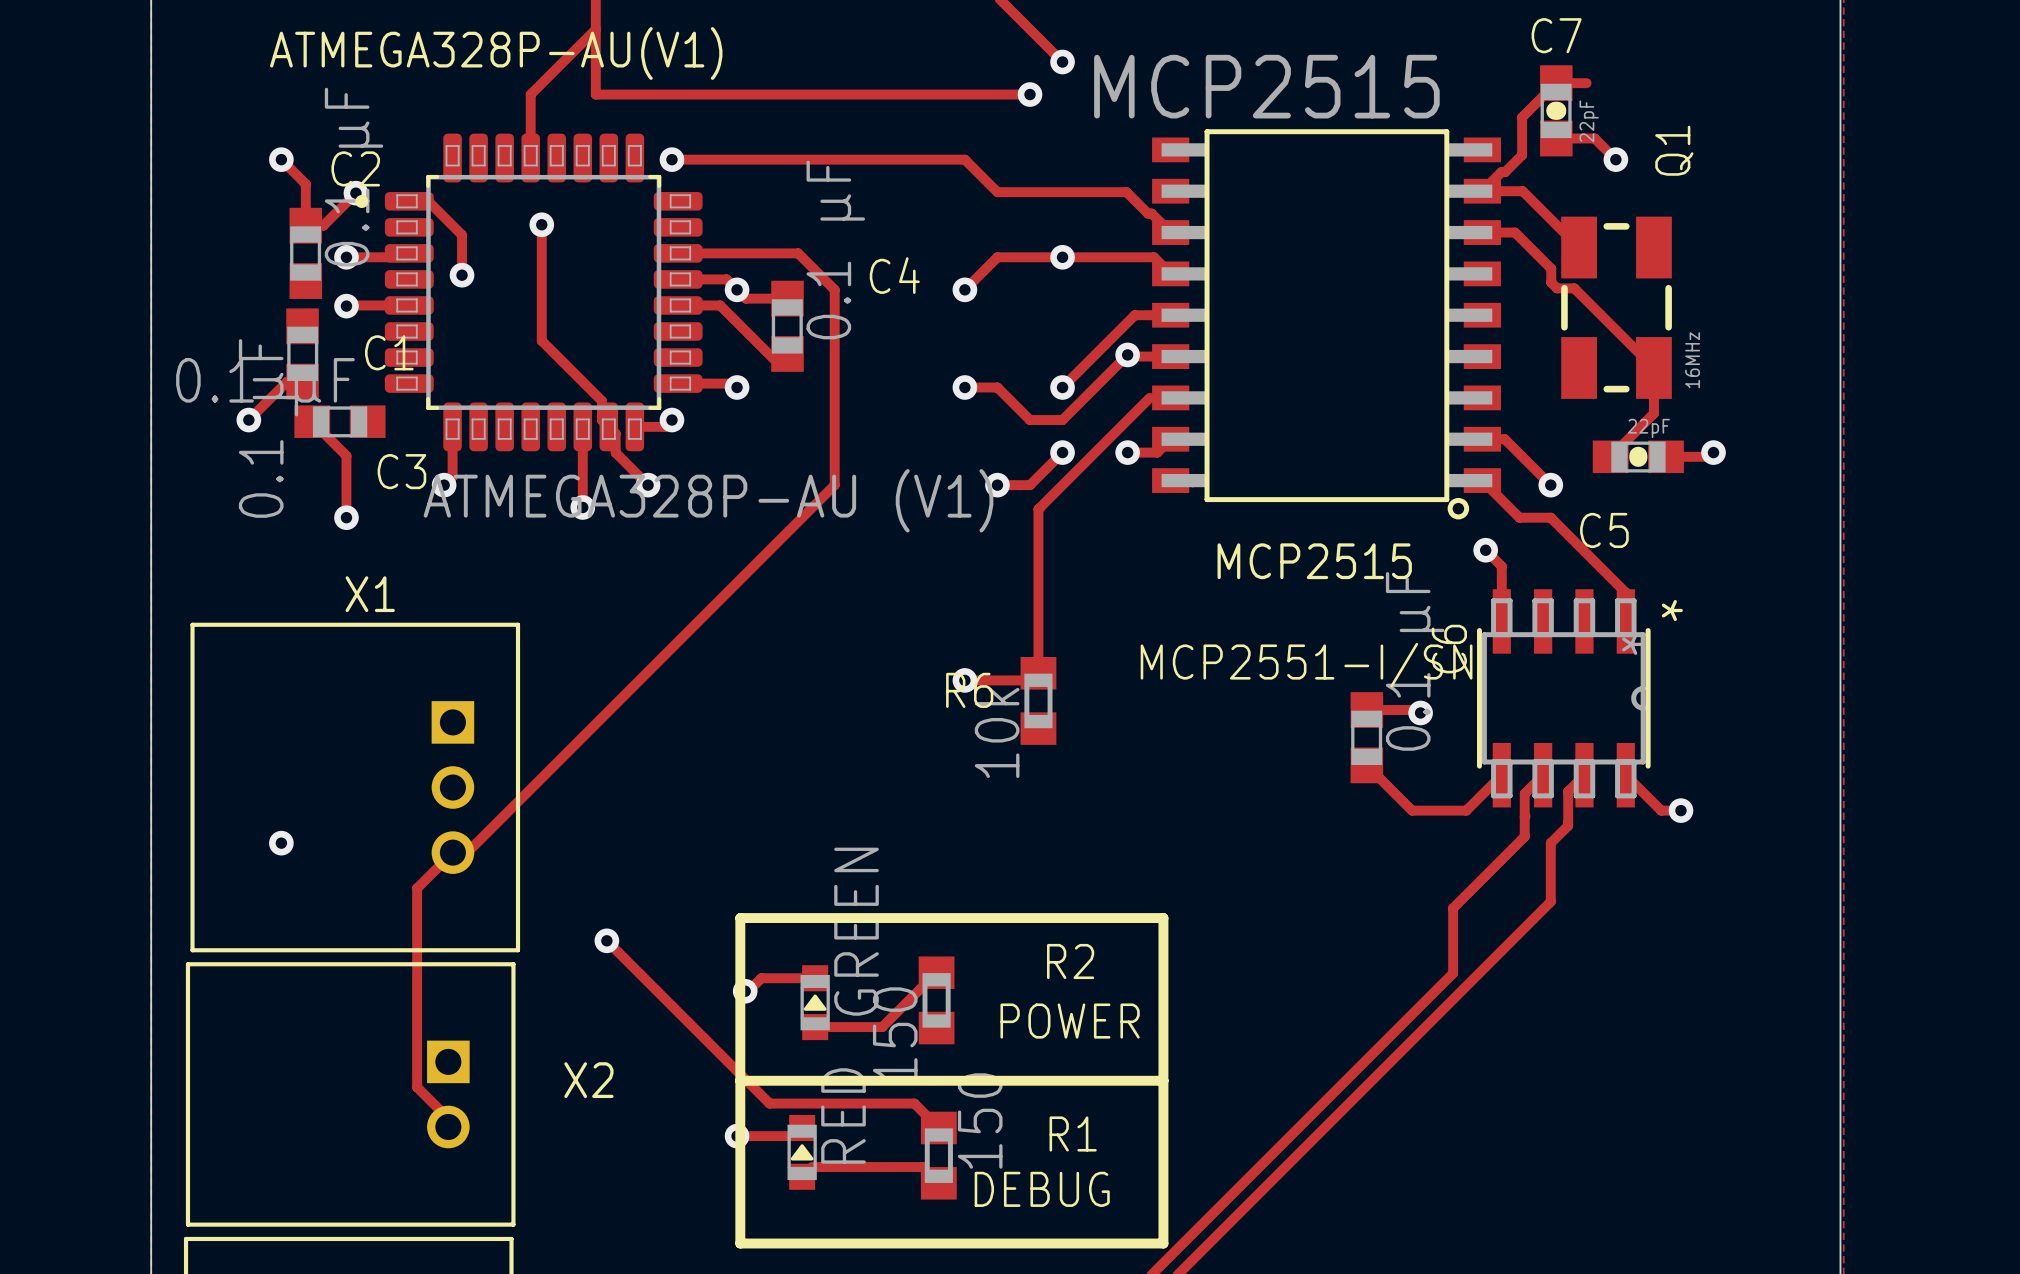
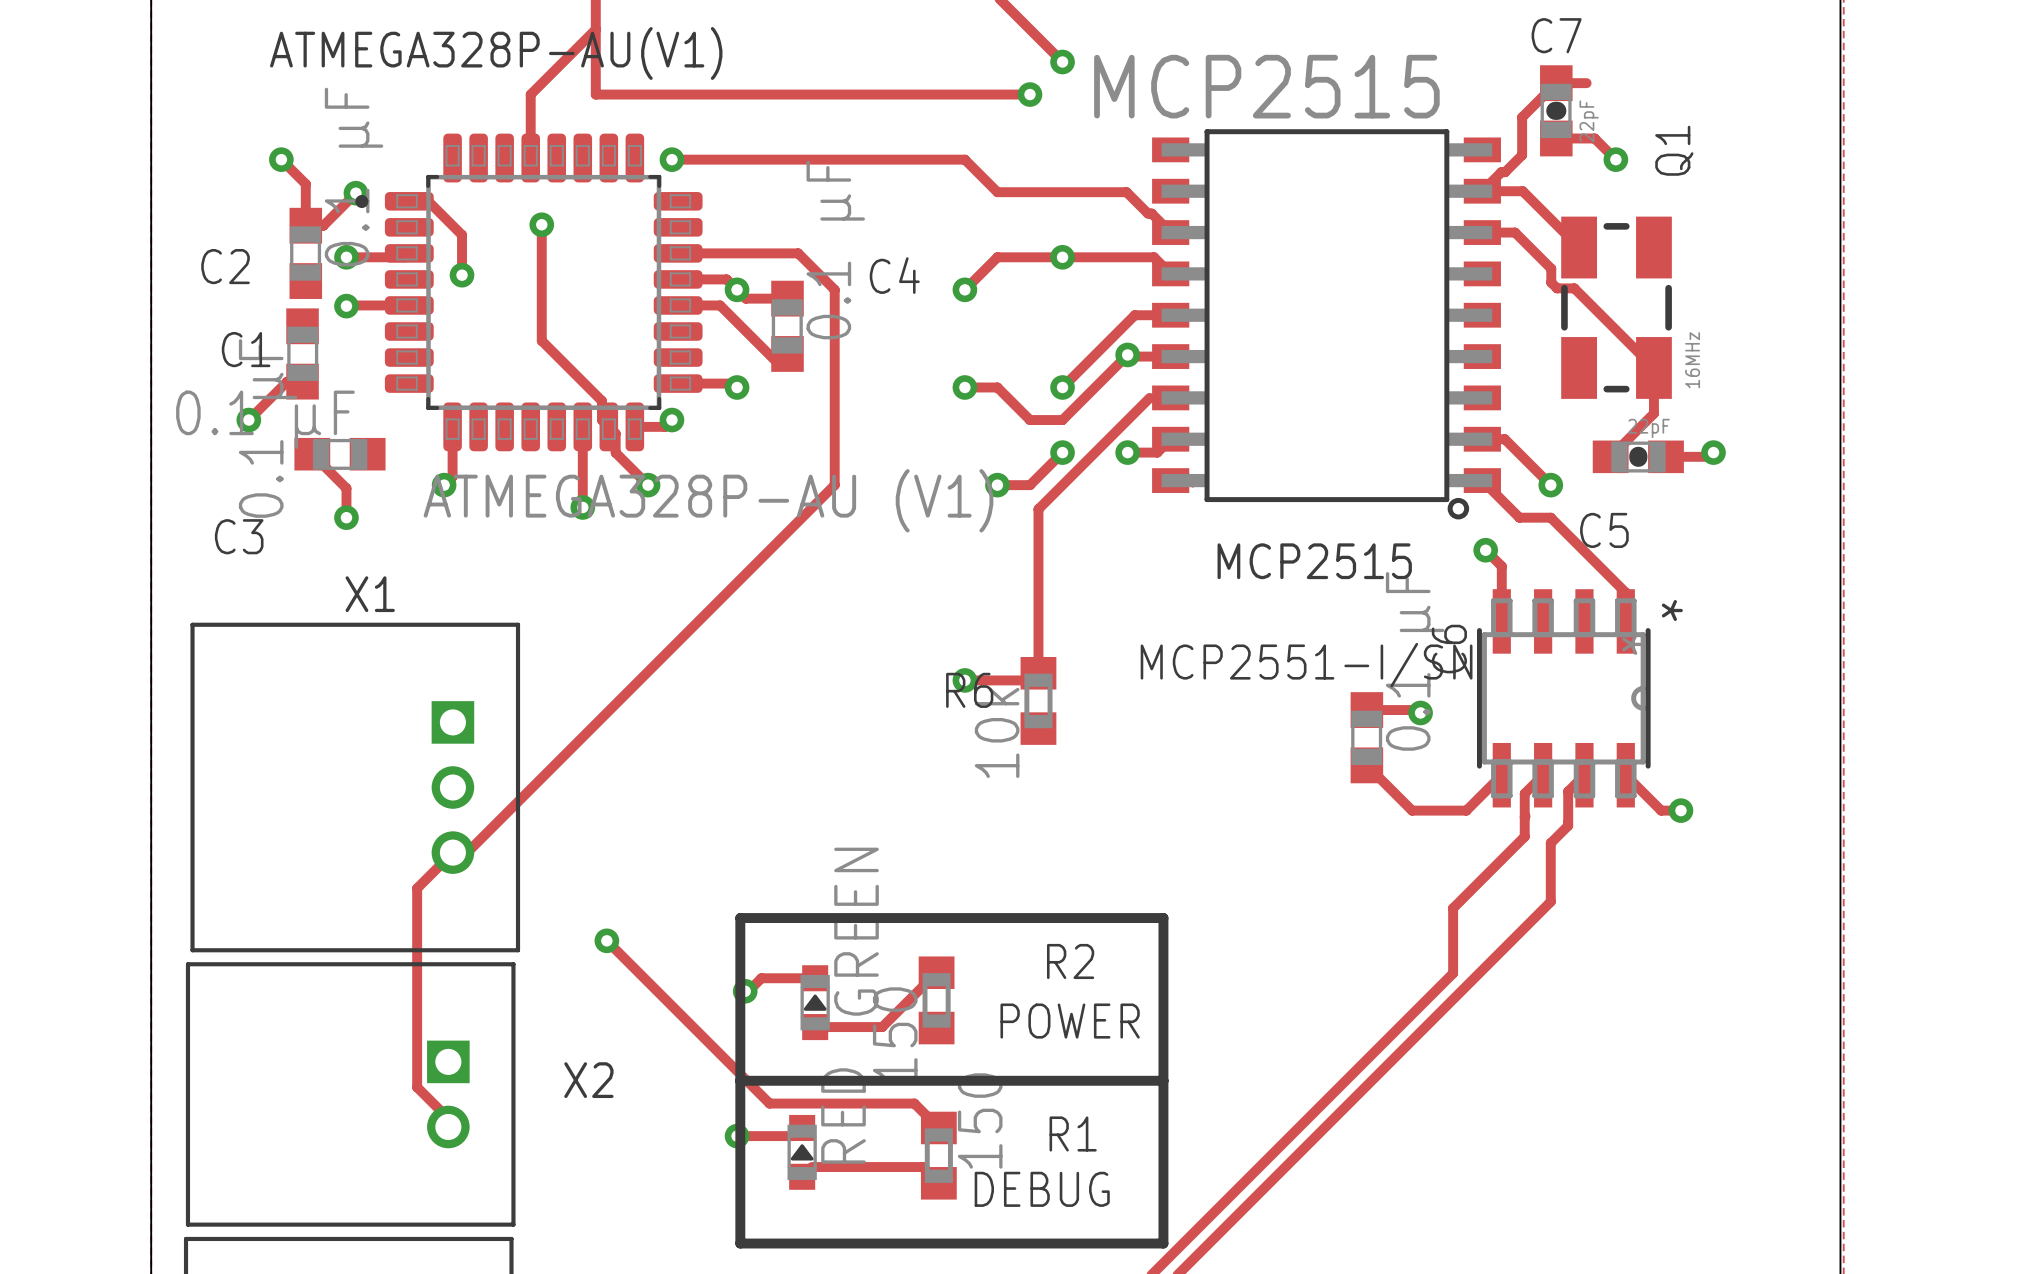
C2 name position: C2 (355, 168) -> C2 (225, 266)
C1 name position: C1 (389, 352) -> C1 (246, 349)
track: (312, 421) (346, 455) (346, 488) -> (312, 454) (346, 488)
C3 position: (339, 421) -> (339, 454)
C3 name position: C3 (401, 471) -> C3 (239, 536)
via: (281, 843) -> none

